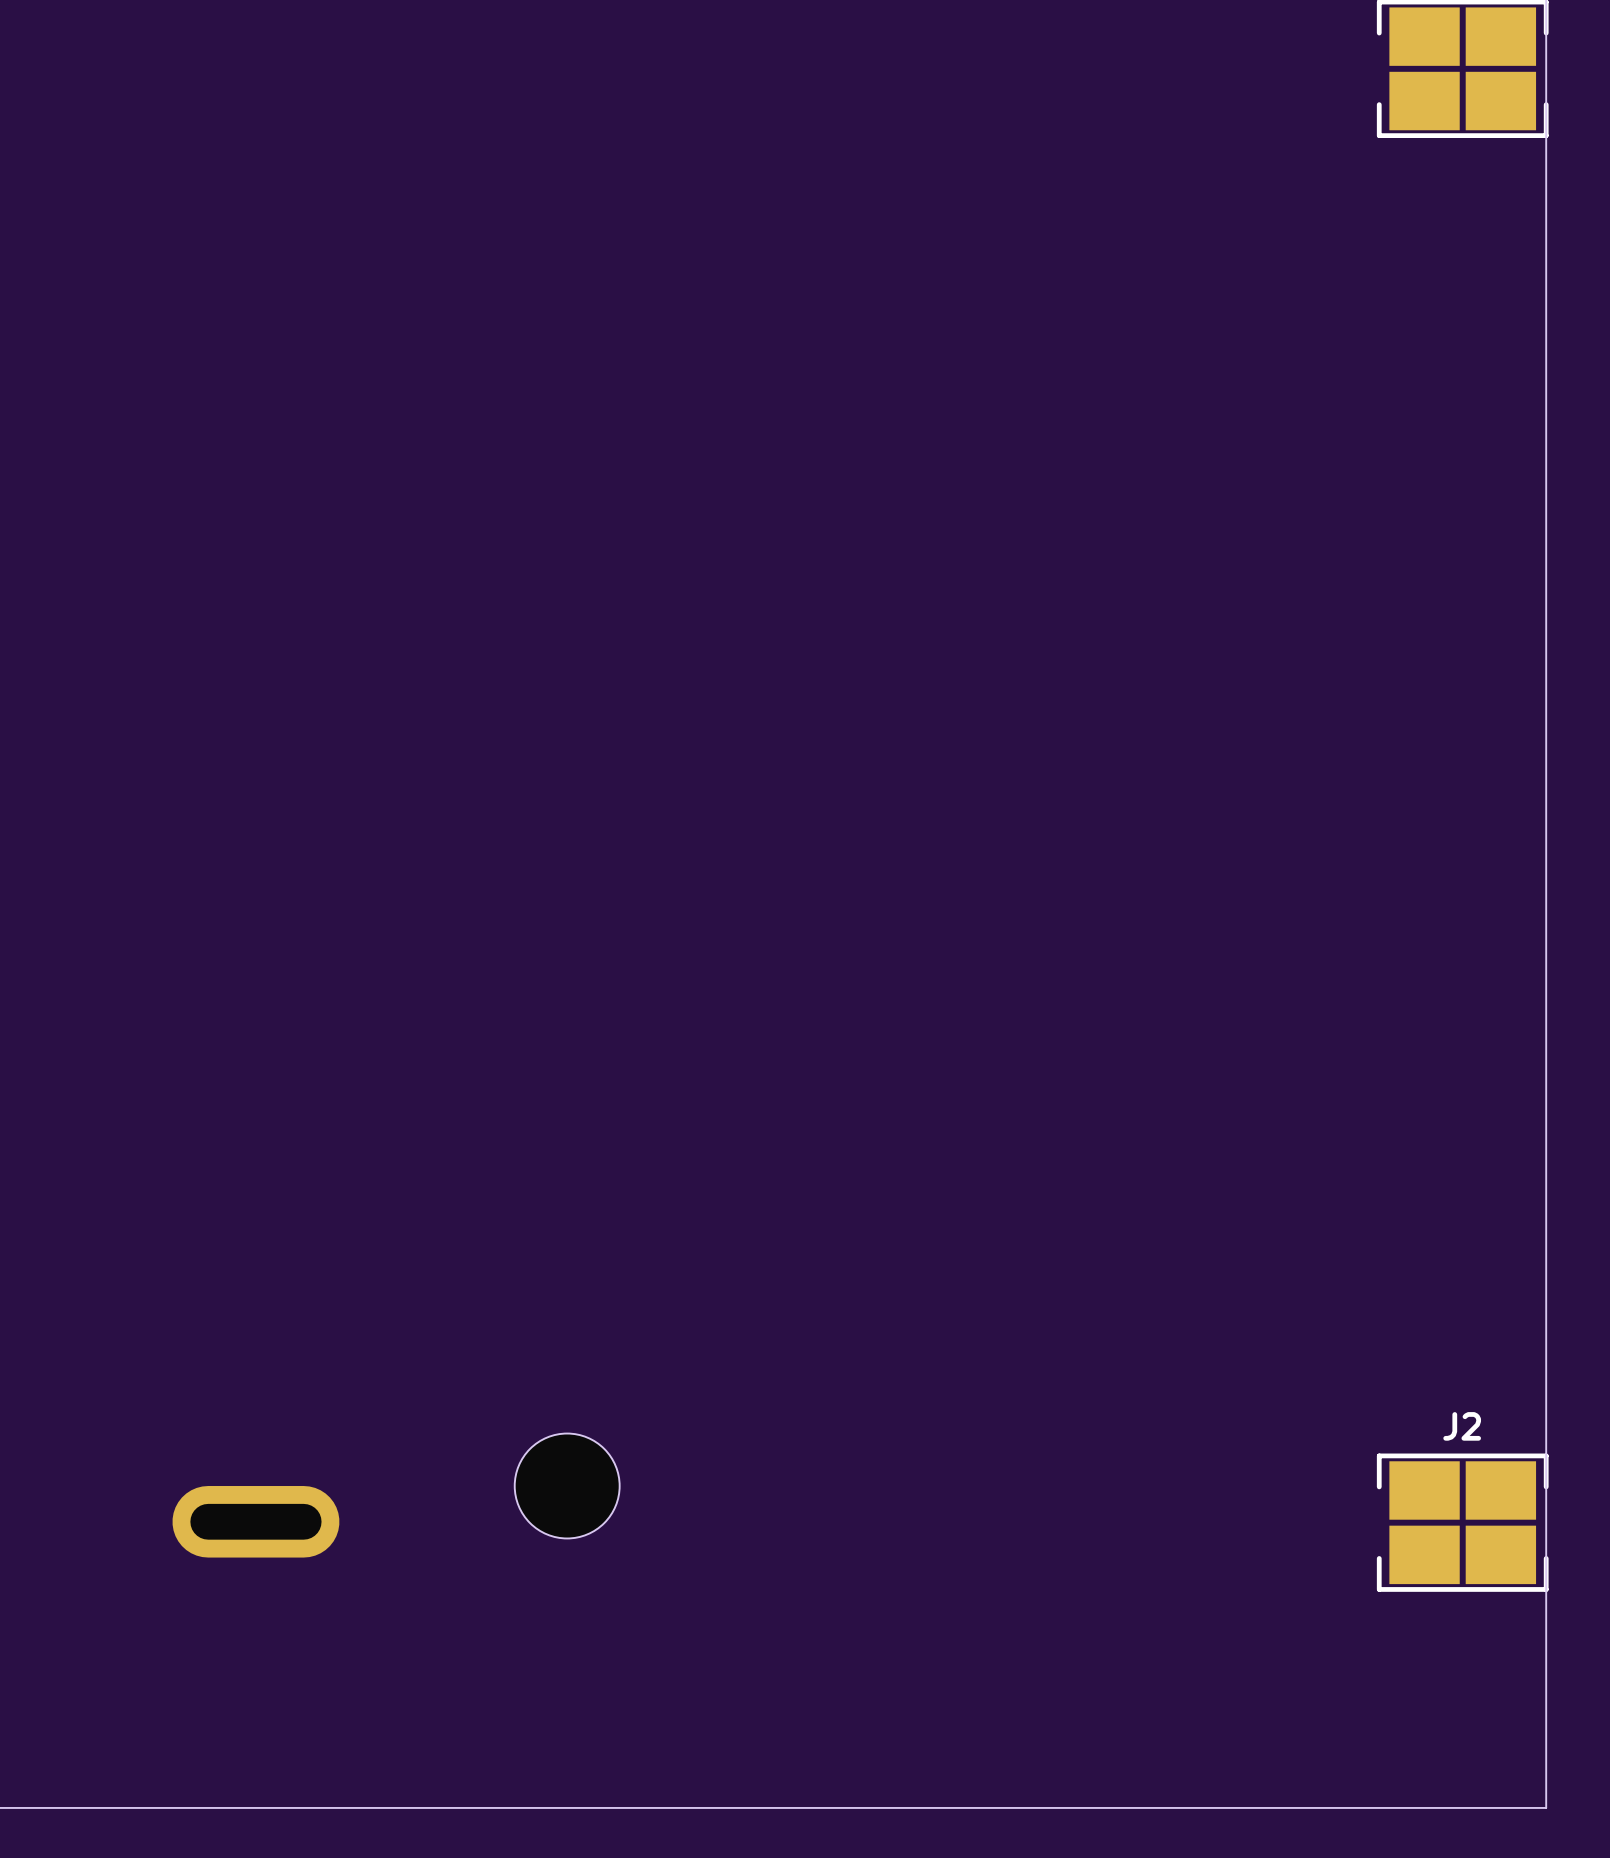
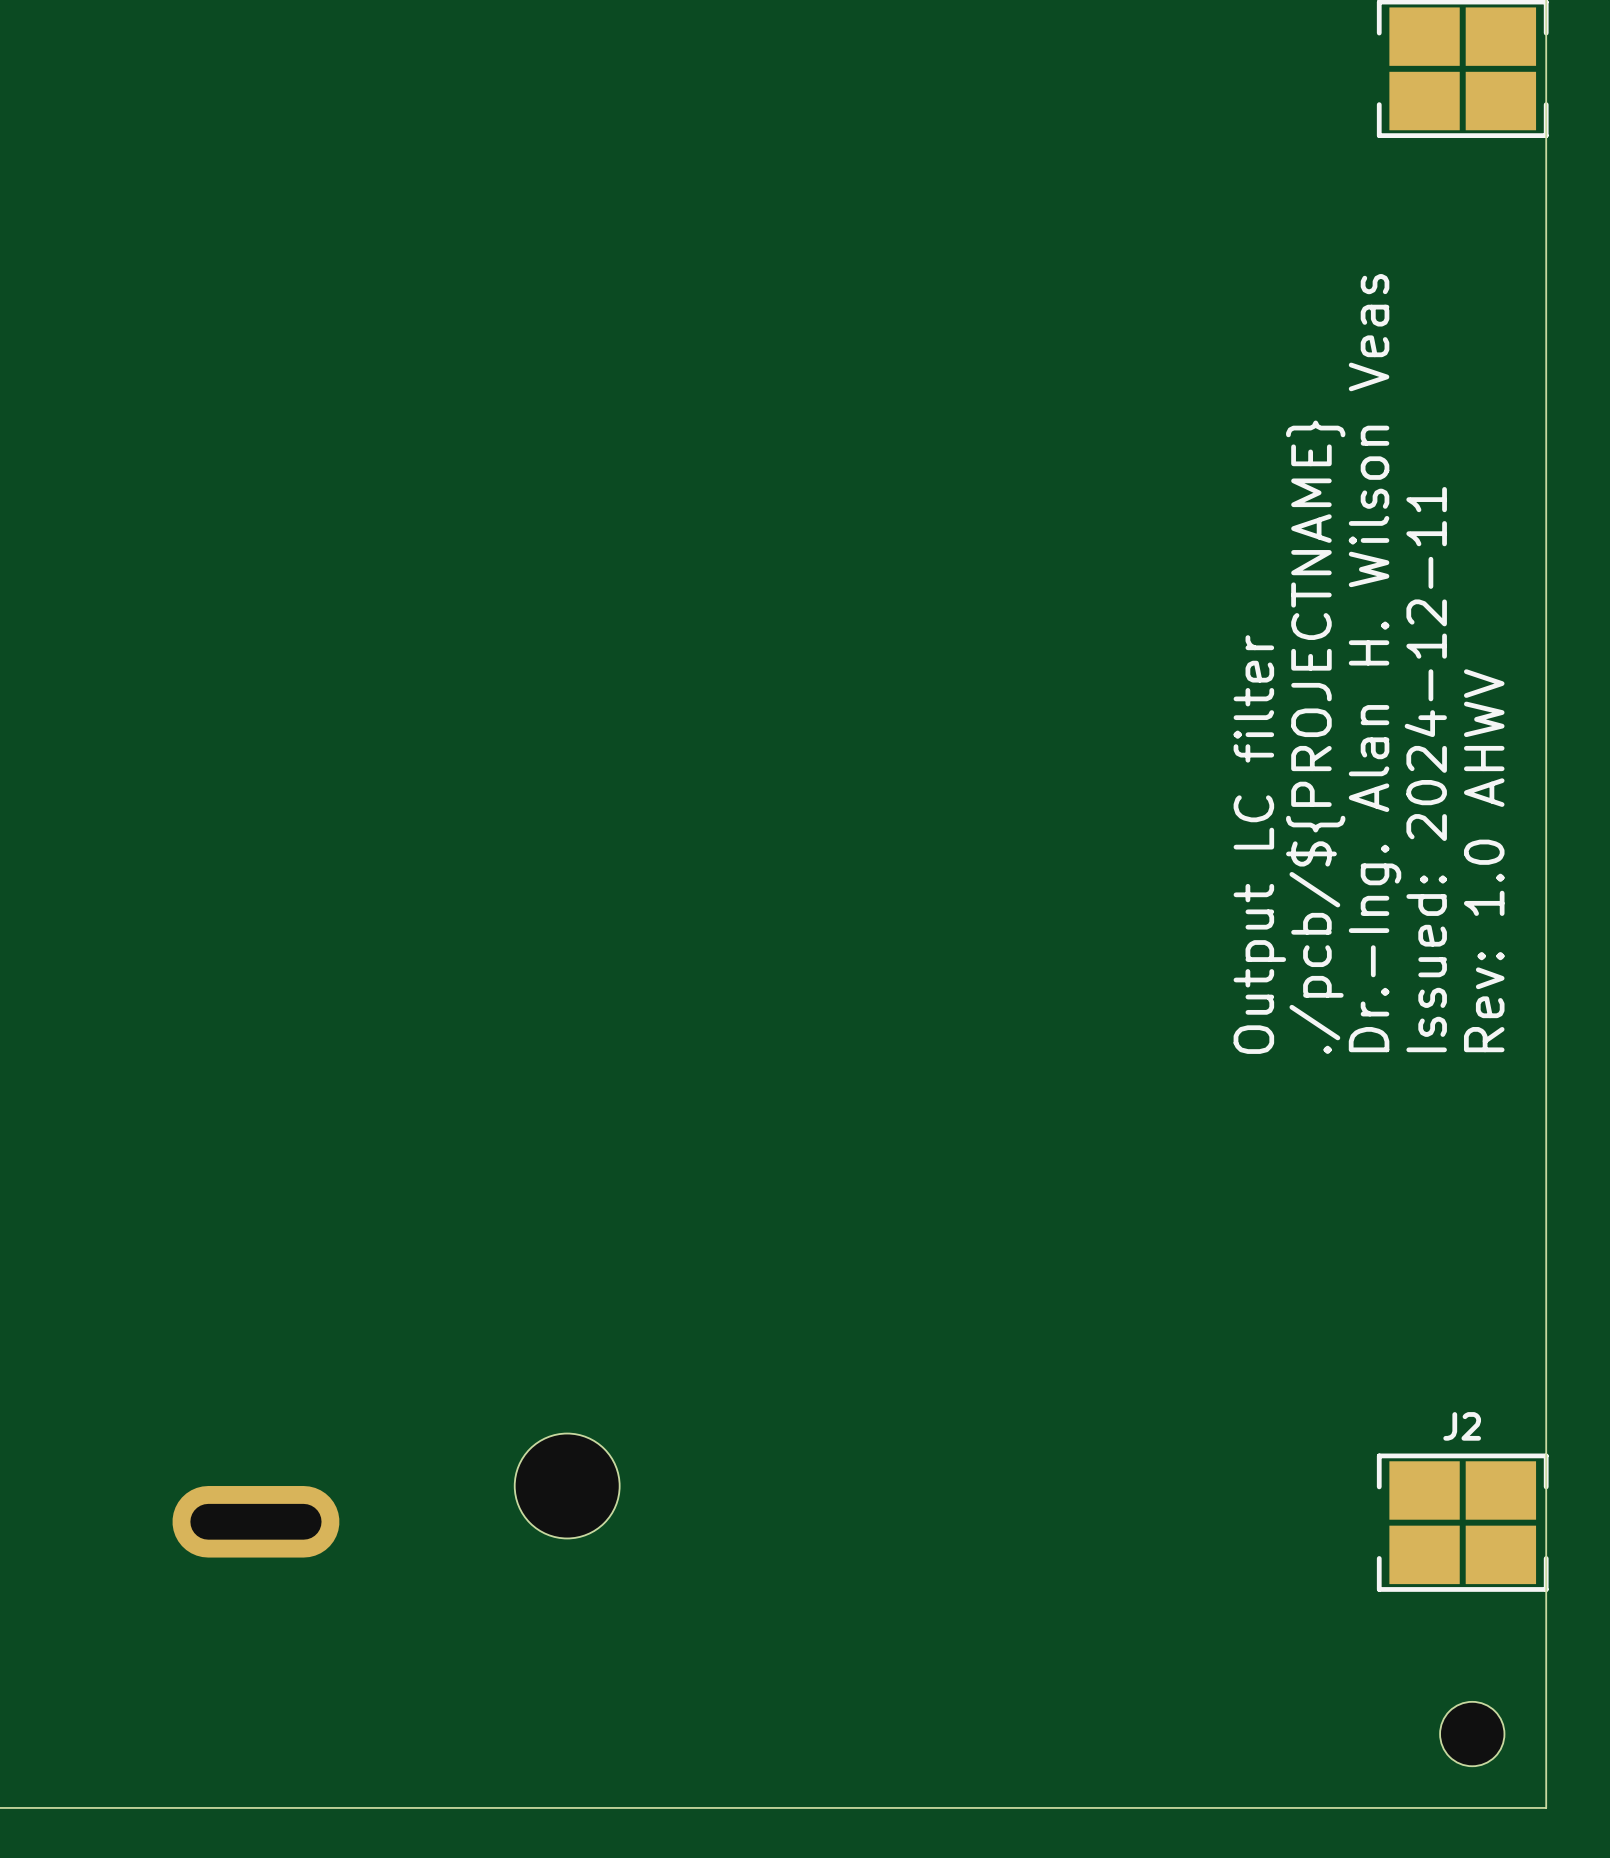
text: none -> Dr.-Ing. Alan H. Wilson Veas (1375, 663)
text: none -> ./pcb/${PROJECTNAME} (1315, 737)
text: none -> Issued: 2024-12-11 (1425, 769)
text: none -> Output LC filter (1259, 844)
text: none -> Rev: 1.0 AHWV (1484, 860)
part: none -> (1472, 1734)

